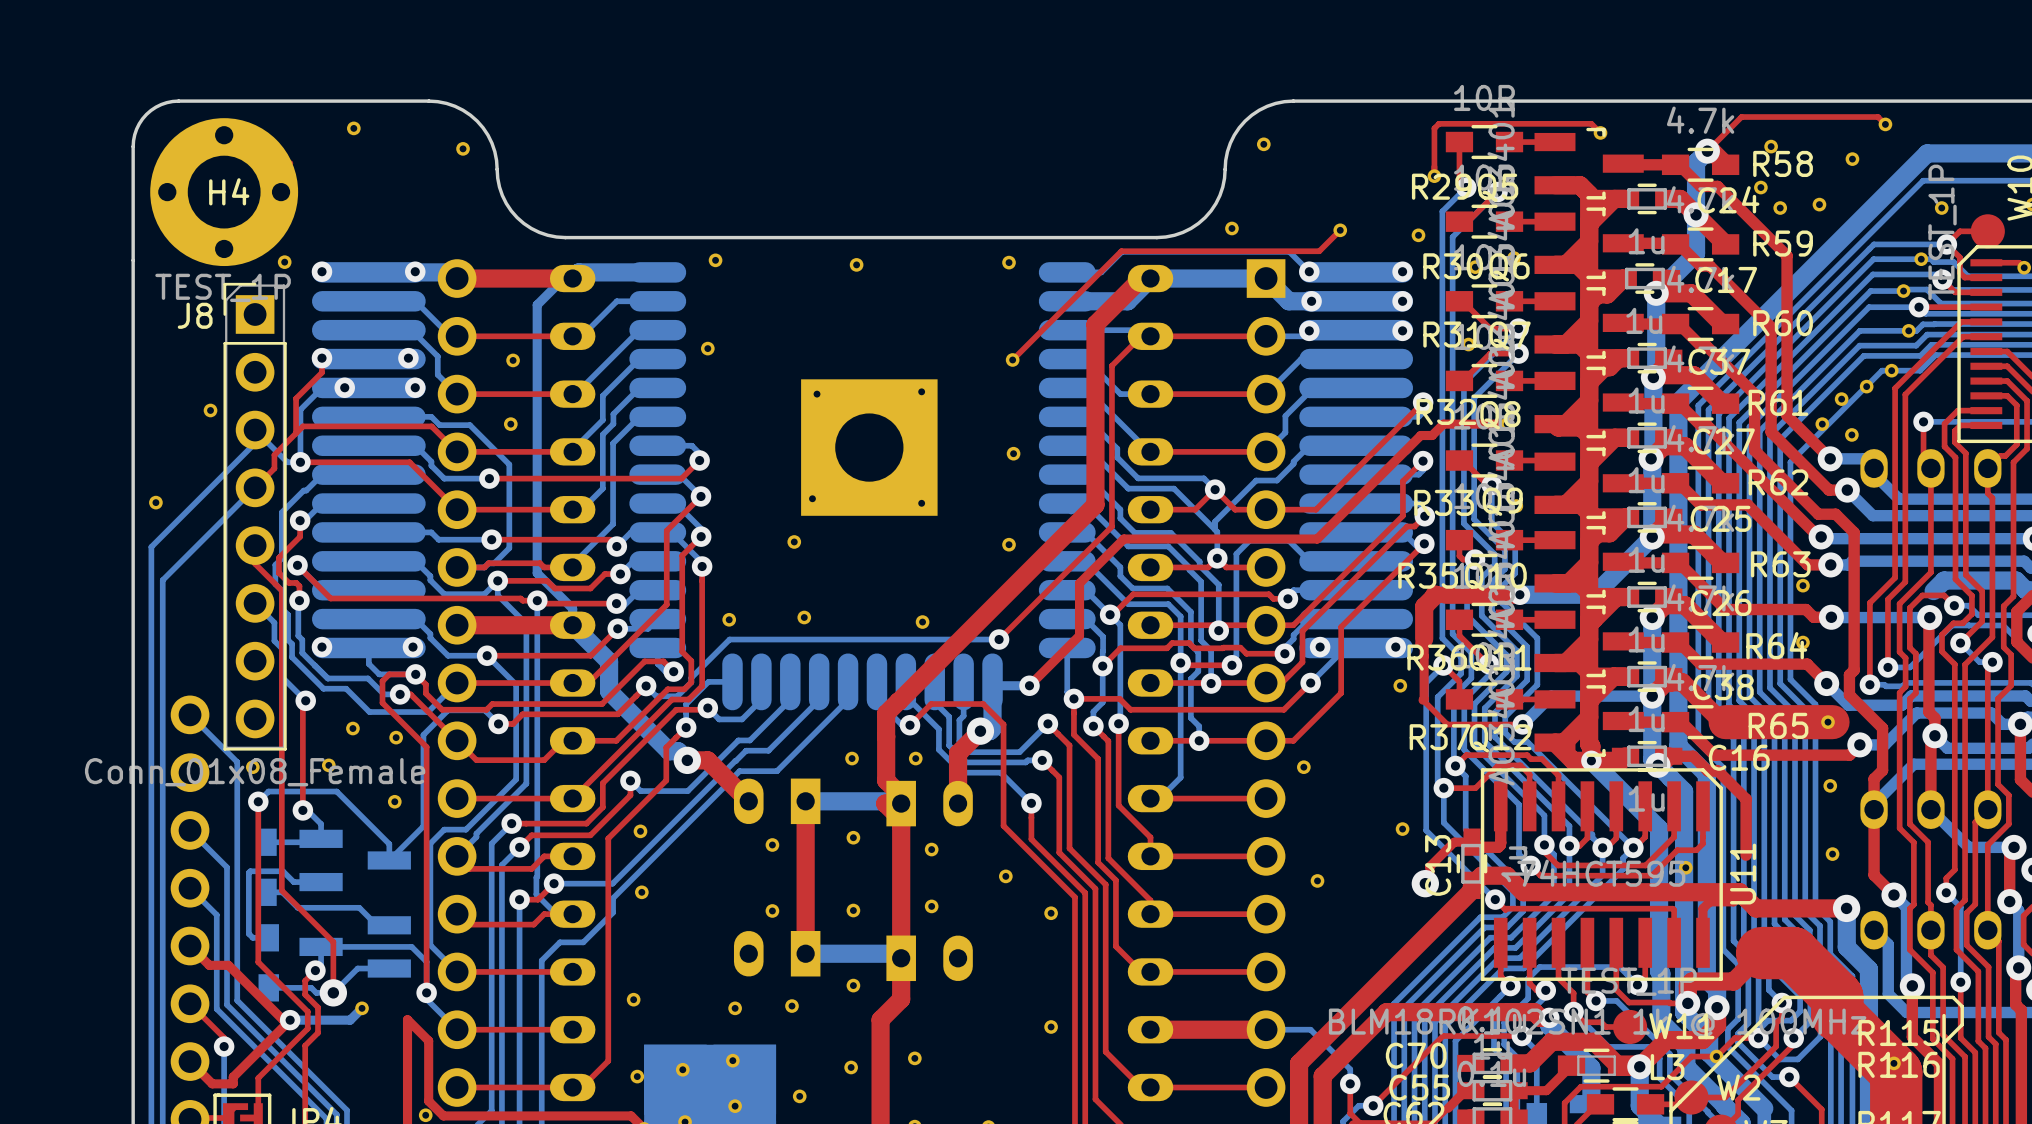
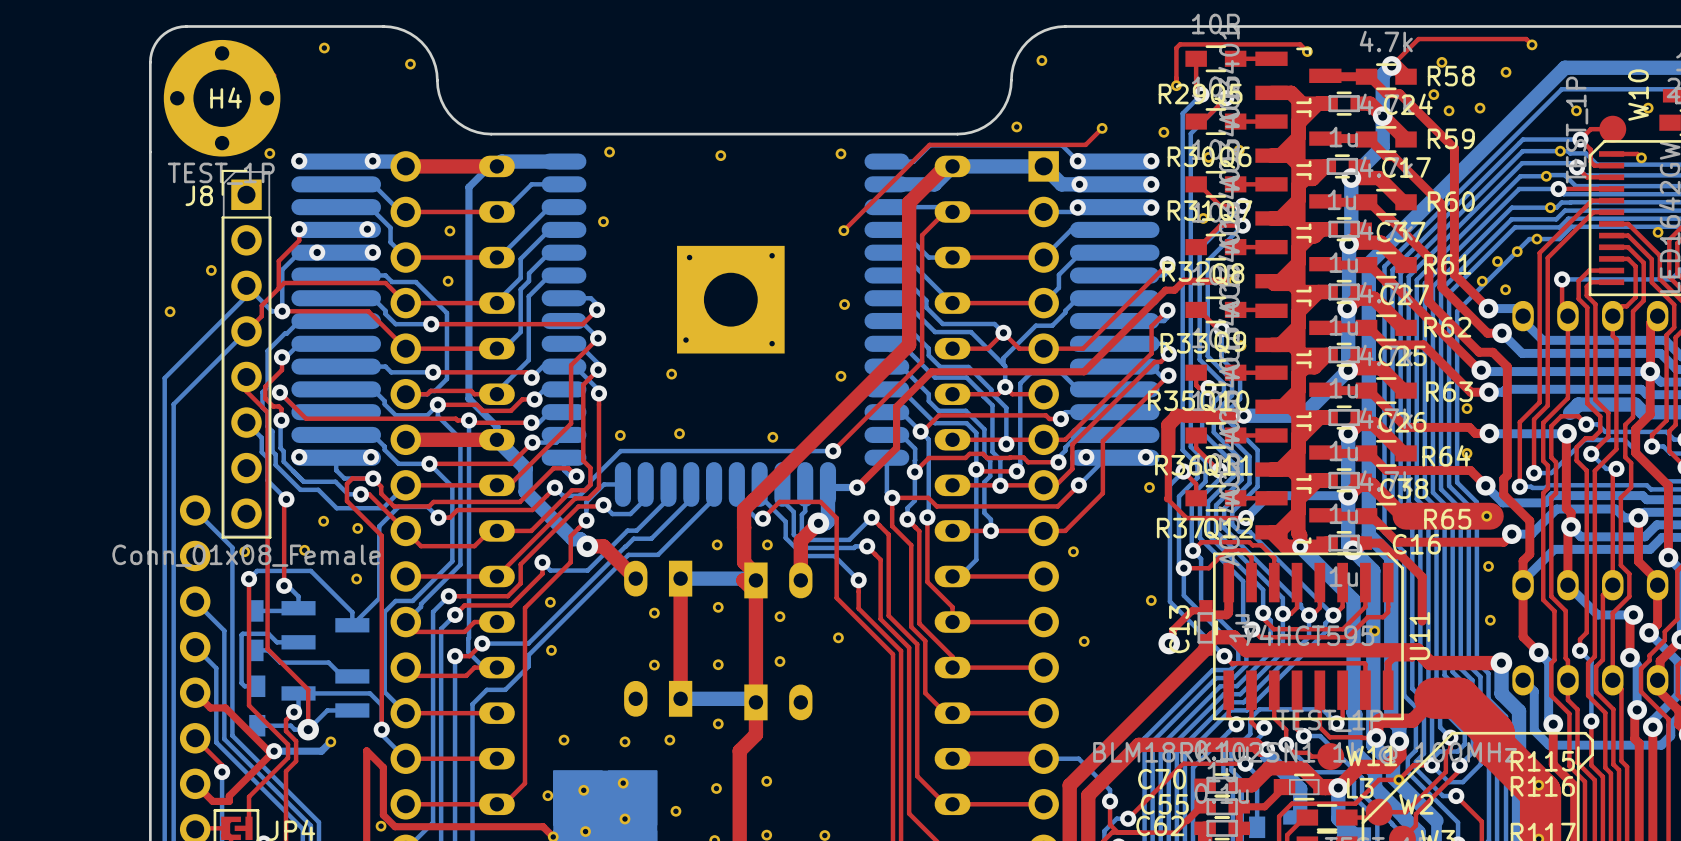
part position: (155, 502) -> (170, 311)
part: (1051, 913) -> none
part position: (633, 999) -> (564, 740)
part: (1051, 1026) -> none

